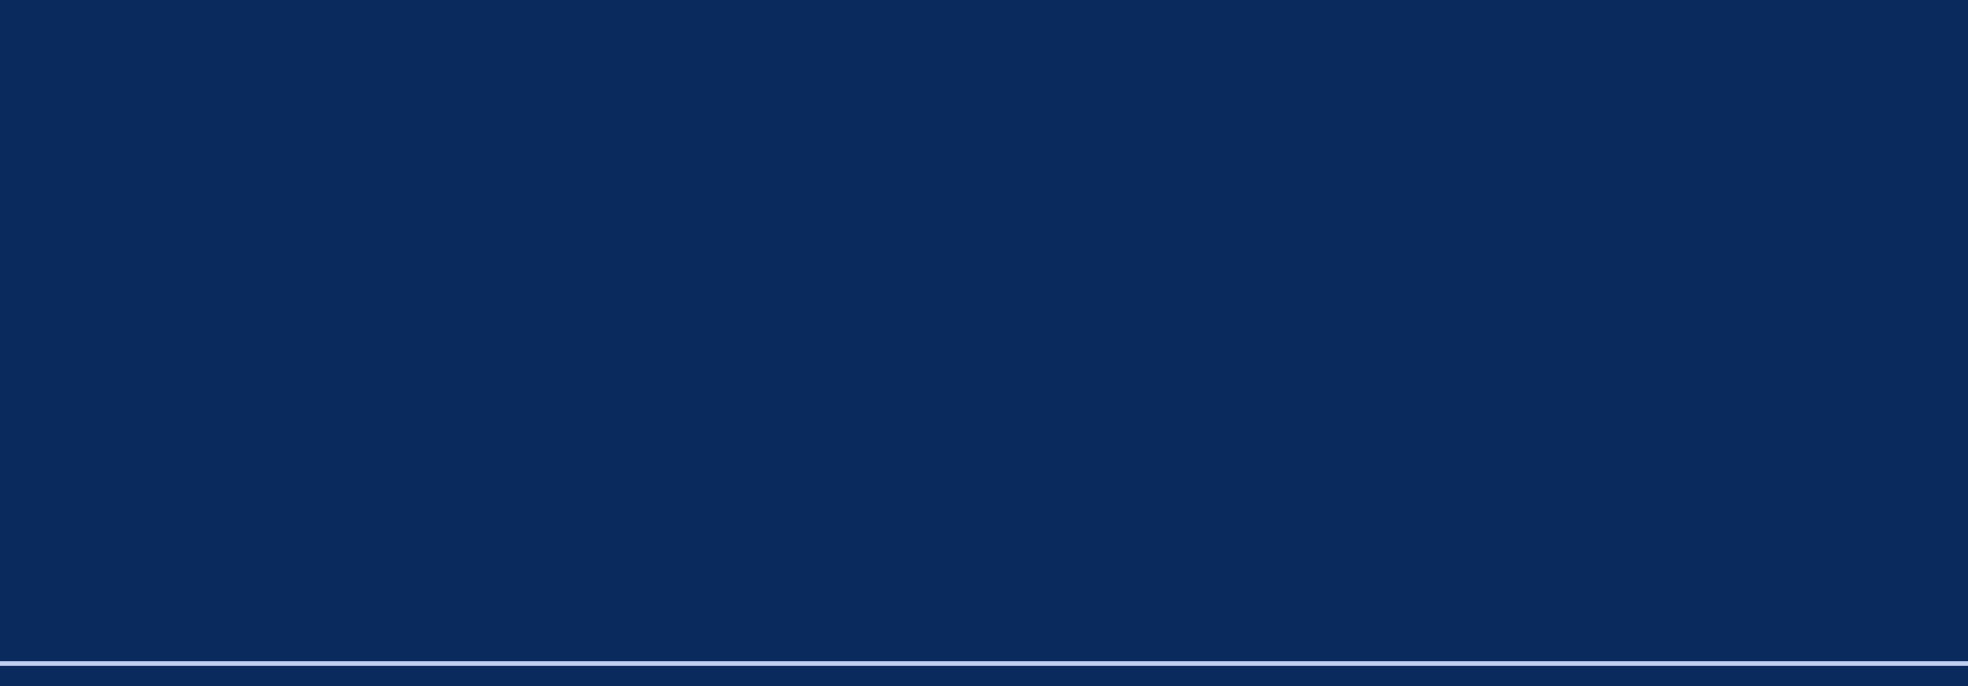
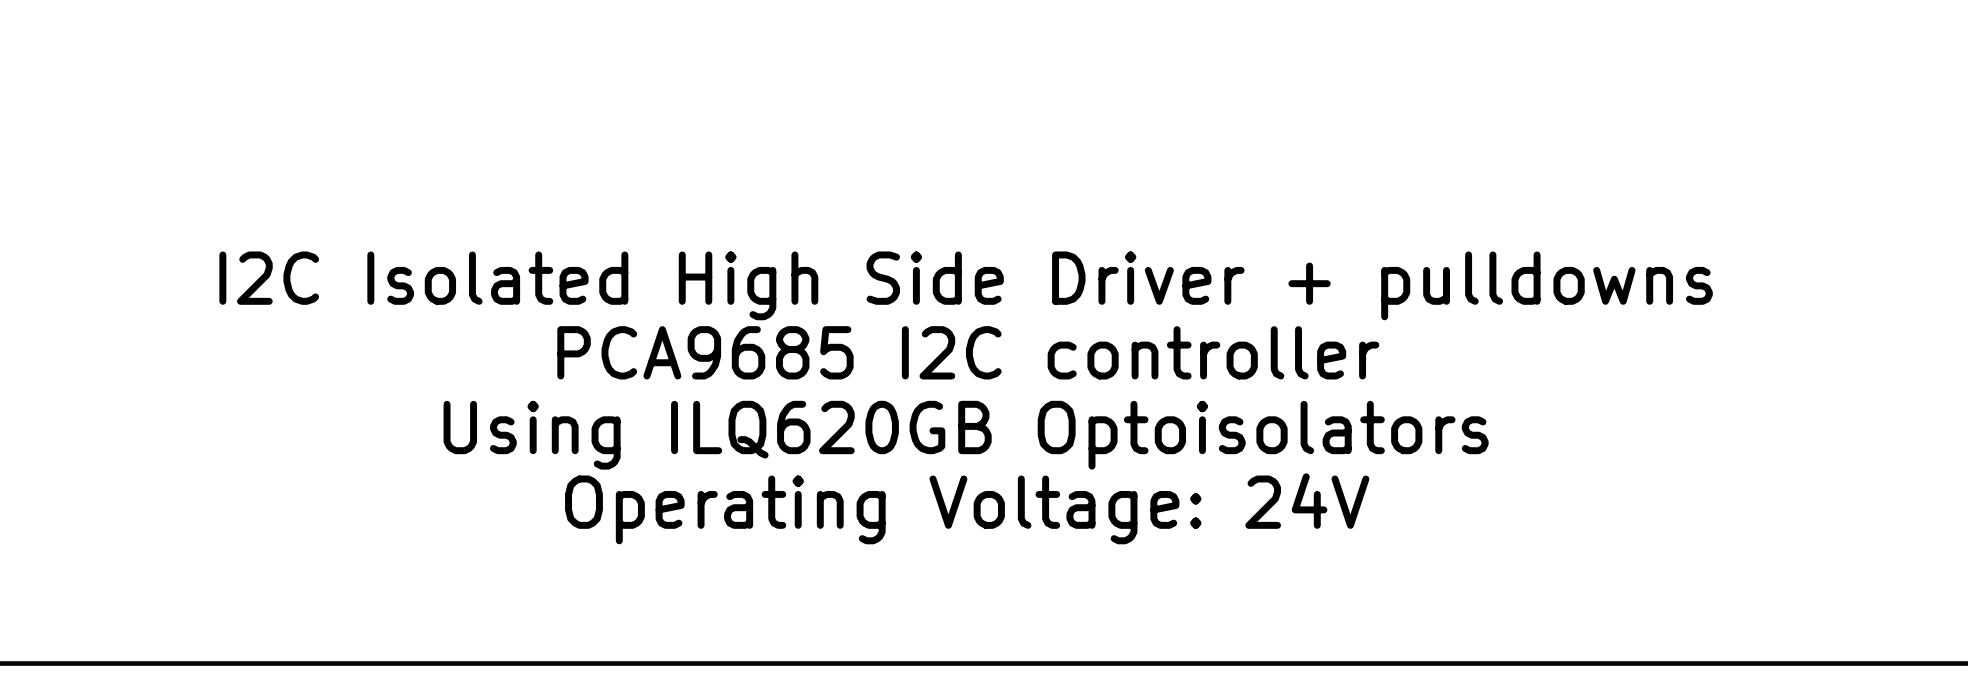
text: none -> I2C Isolated High Side Driver + pulldowns (966, 285)
text: none -> PCA9685 I2C controller (968, 352)
text: none -> Using ILQ620GB Optoisolators (966, 435)
text: none -> Operating Voltage: 24V (967, 508)

